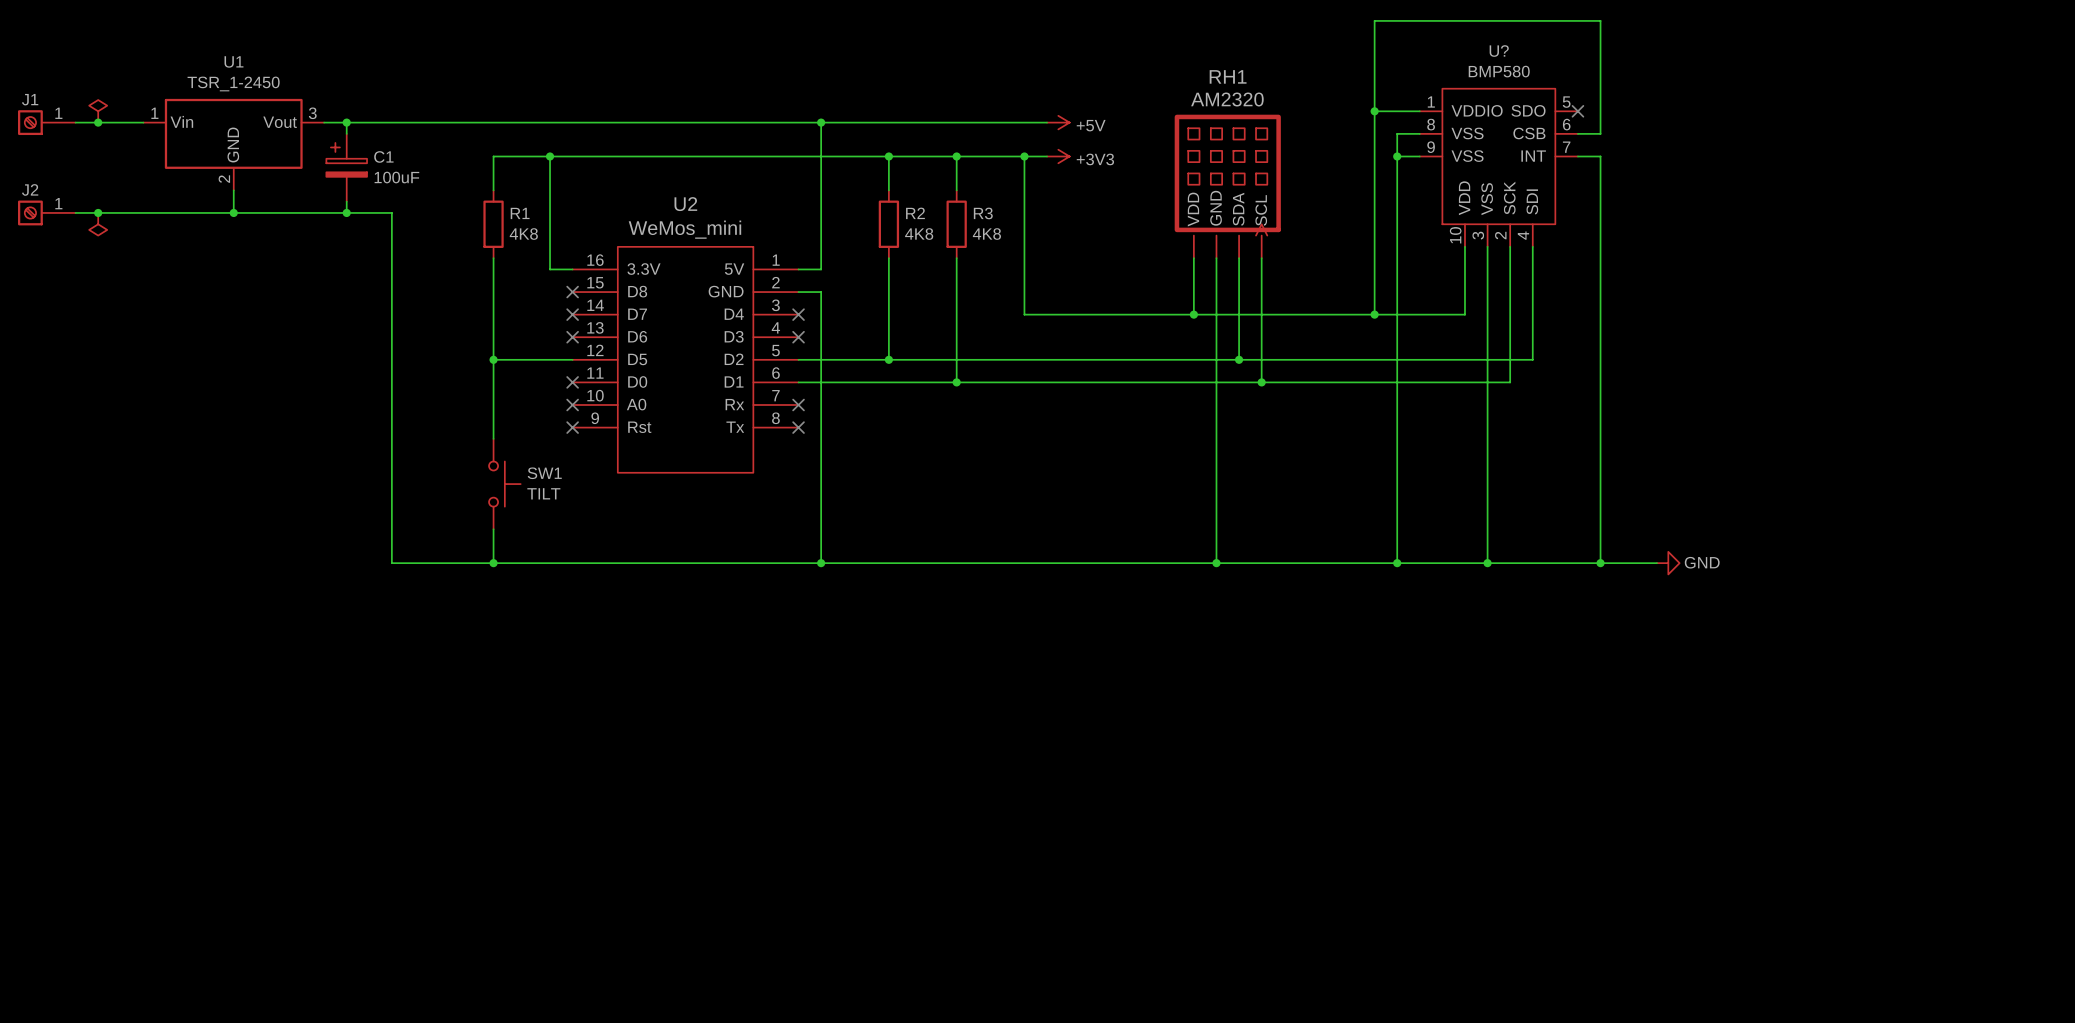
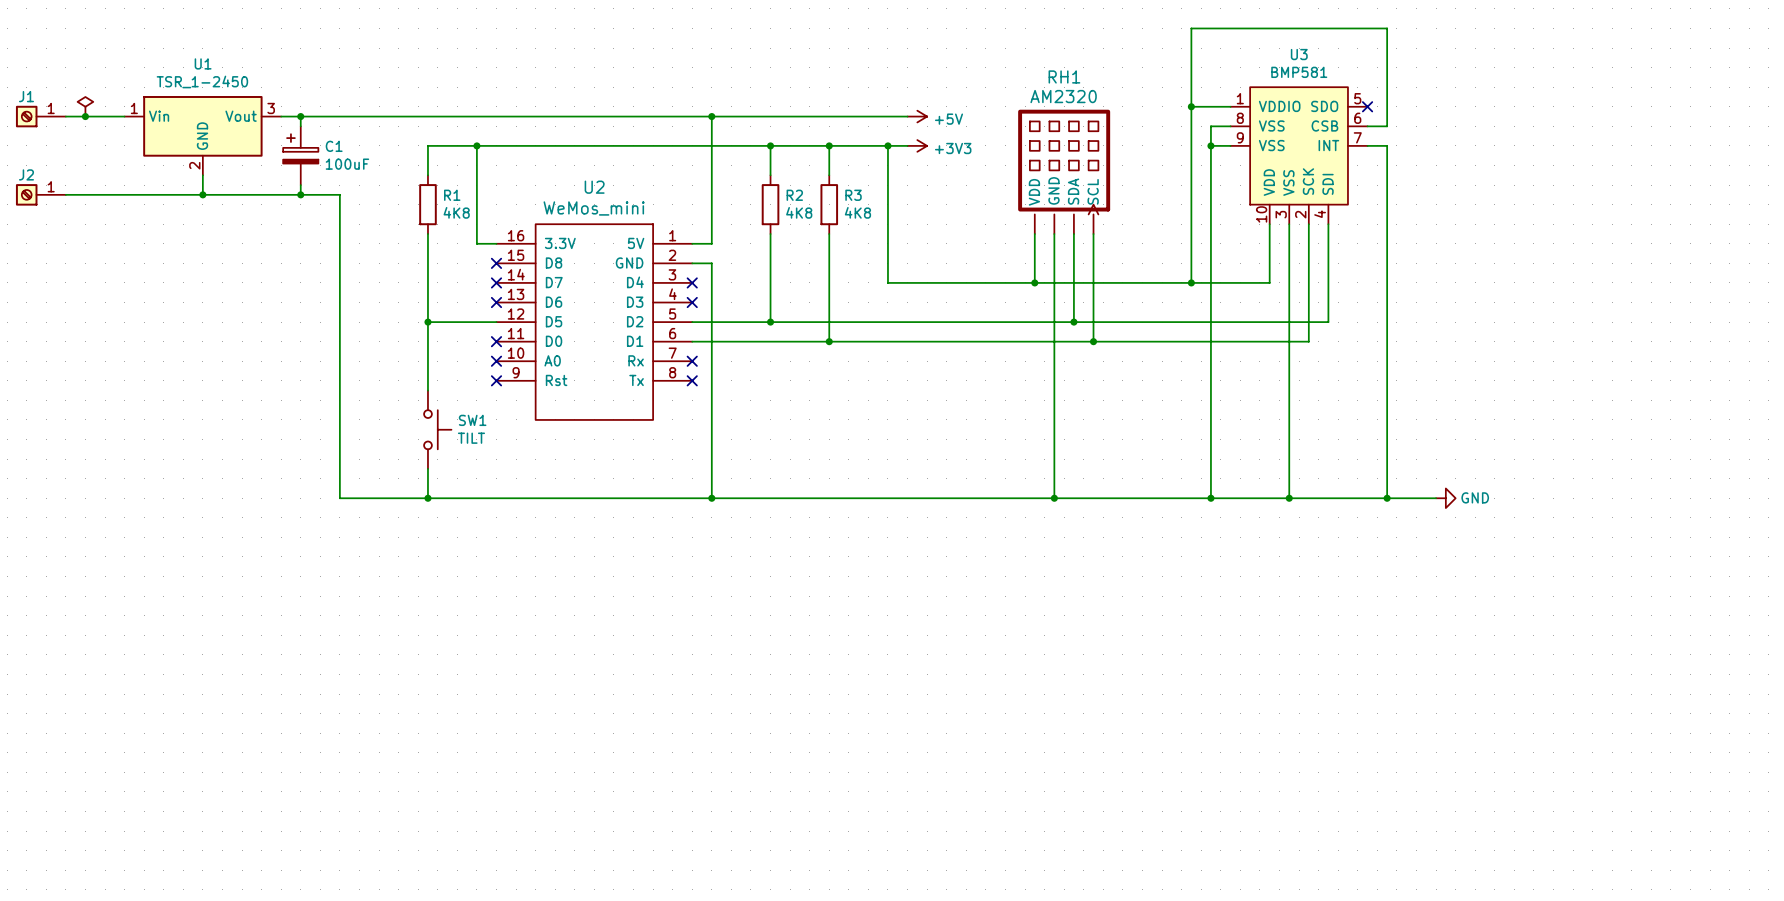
U? name: U? (1499, 51) -> U3 (1299, 54)
U? value: BMP580 (1499, 71) -> BMP581 (1299, 72)
junction: (98, 212) -> none
power symbol: (98, 224) -> none

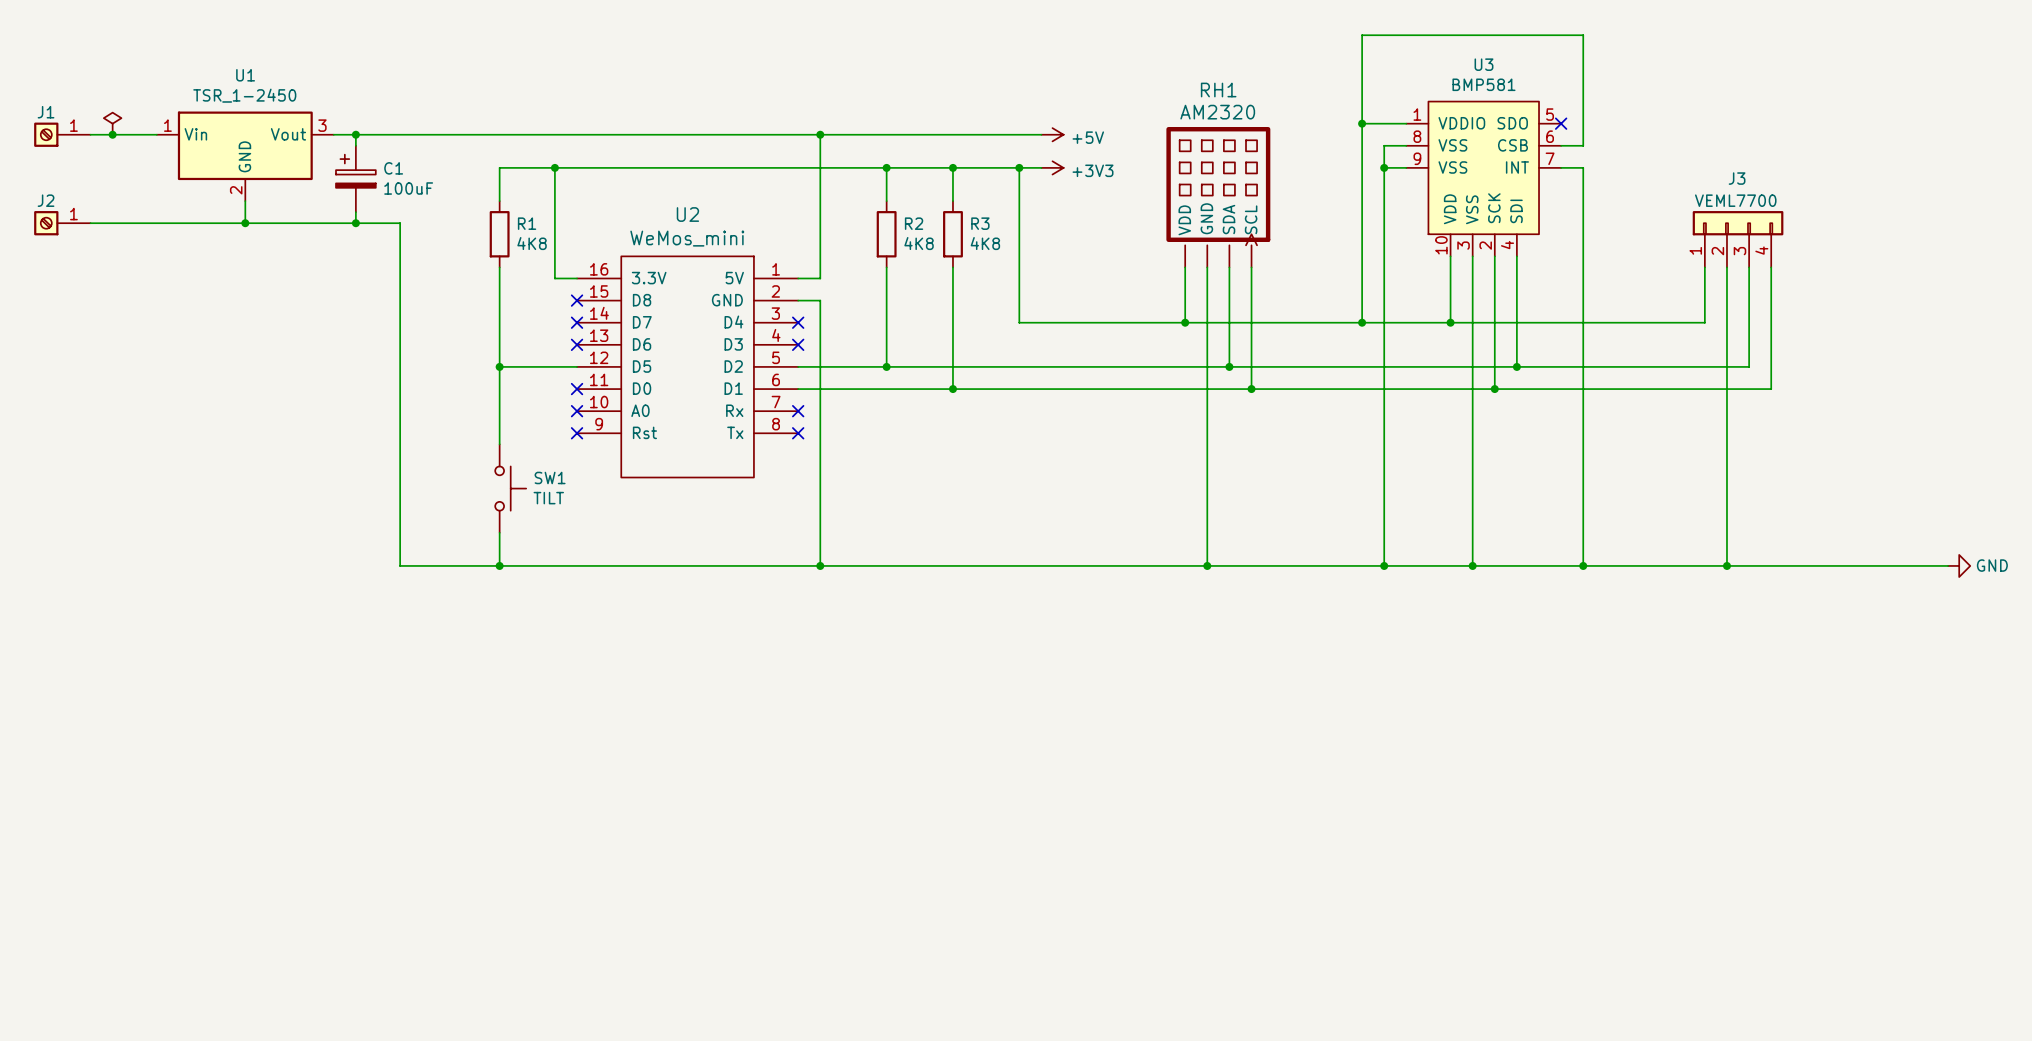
J3: none -> VEML7700 (1738, 239)
wire: none -> (1704, 267) (1704, 322) (1450, 322)
wire: none -> (1726, 267) (1726, 565)
wire: none -> (1749, 267) (1749, 366) (1516, 366)
wire: none -> (1771, 267) (1771, 389) (1494, 389)
junction: none -> (1450, 322)
junction: none -> (1516, 366)
junction: none -> (1494, 389)
wire: none -> (1638, 565) (1948, 565)
power symbol: GND (1445, 498) -> none
junction: none -> (1726, 565)
power symbol: none -> GND (1959, 565)

